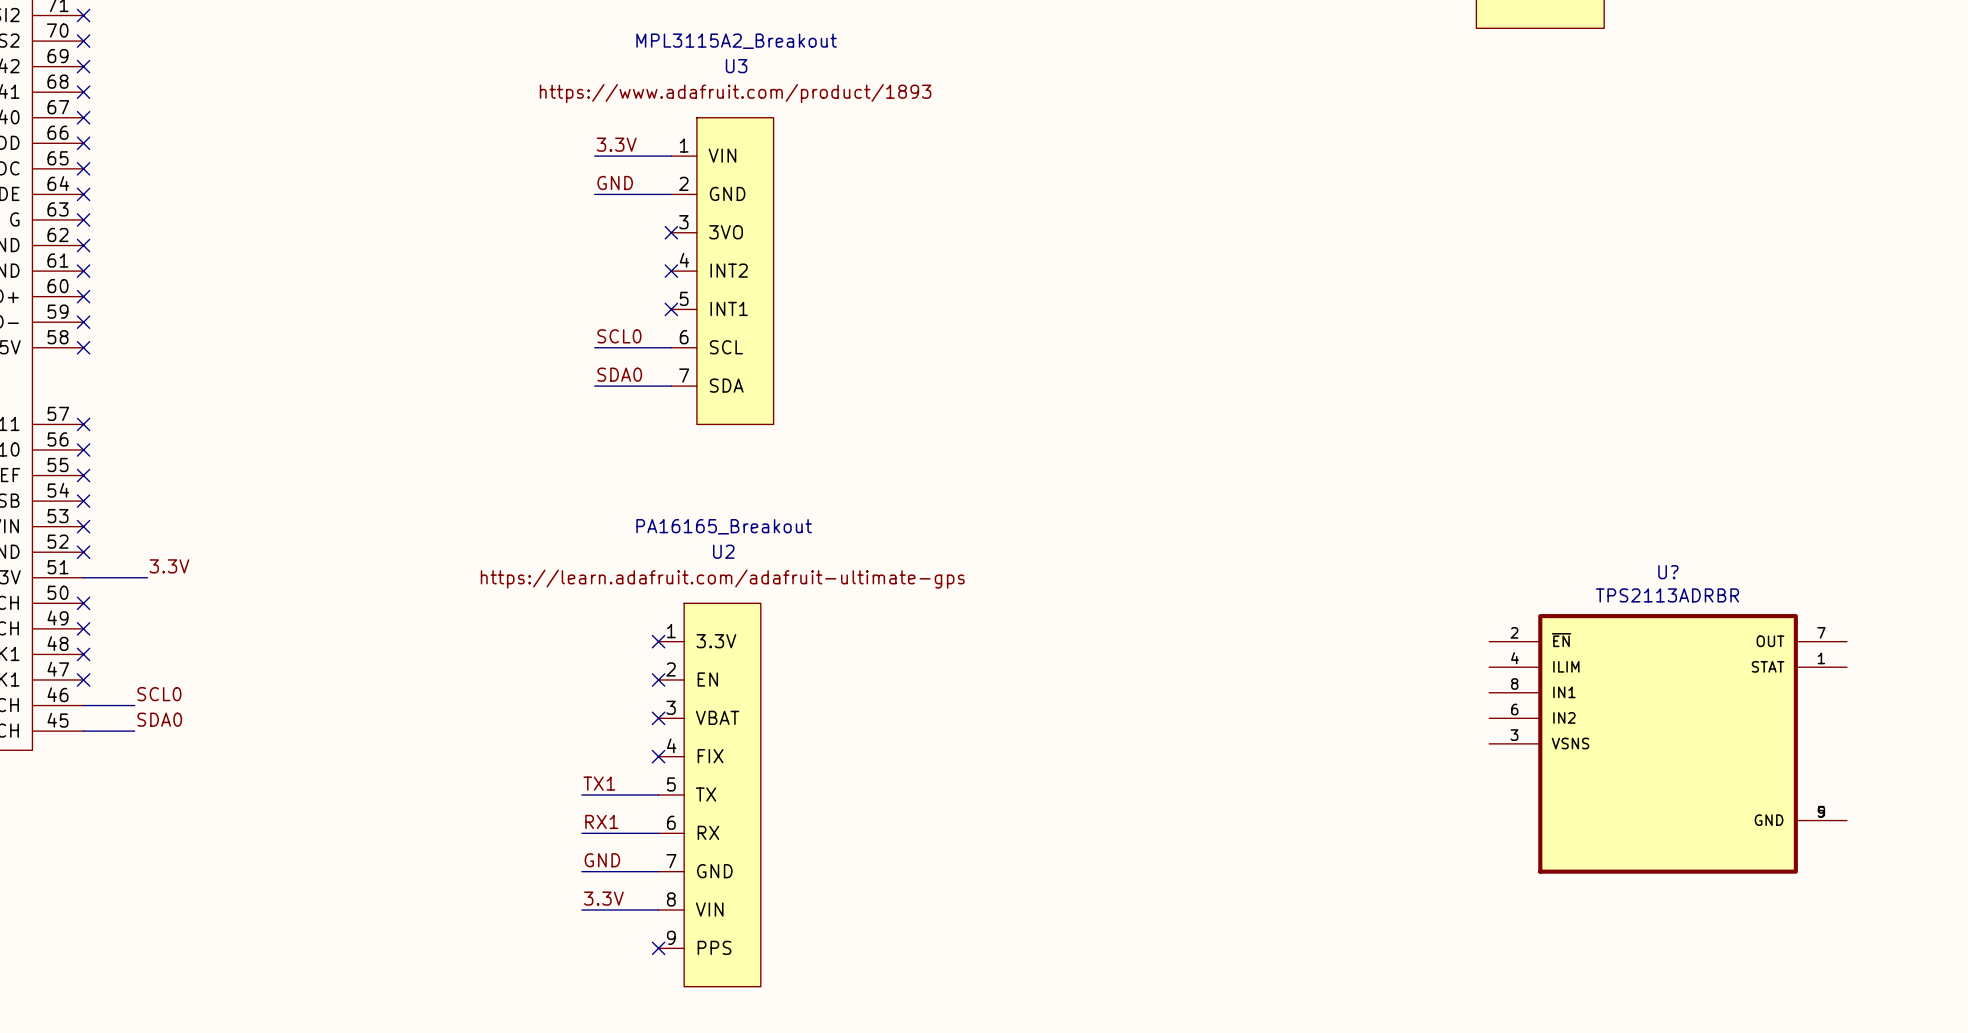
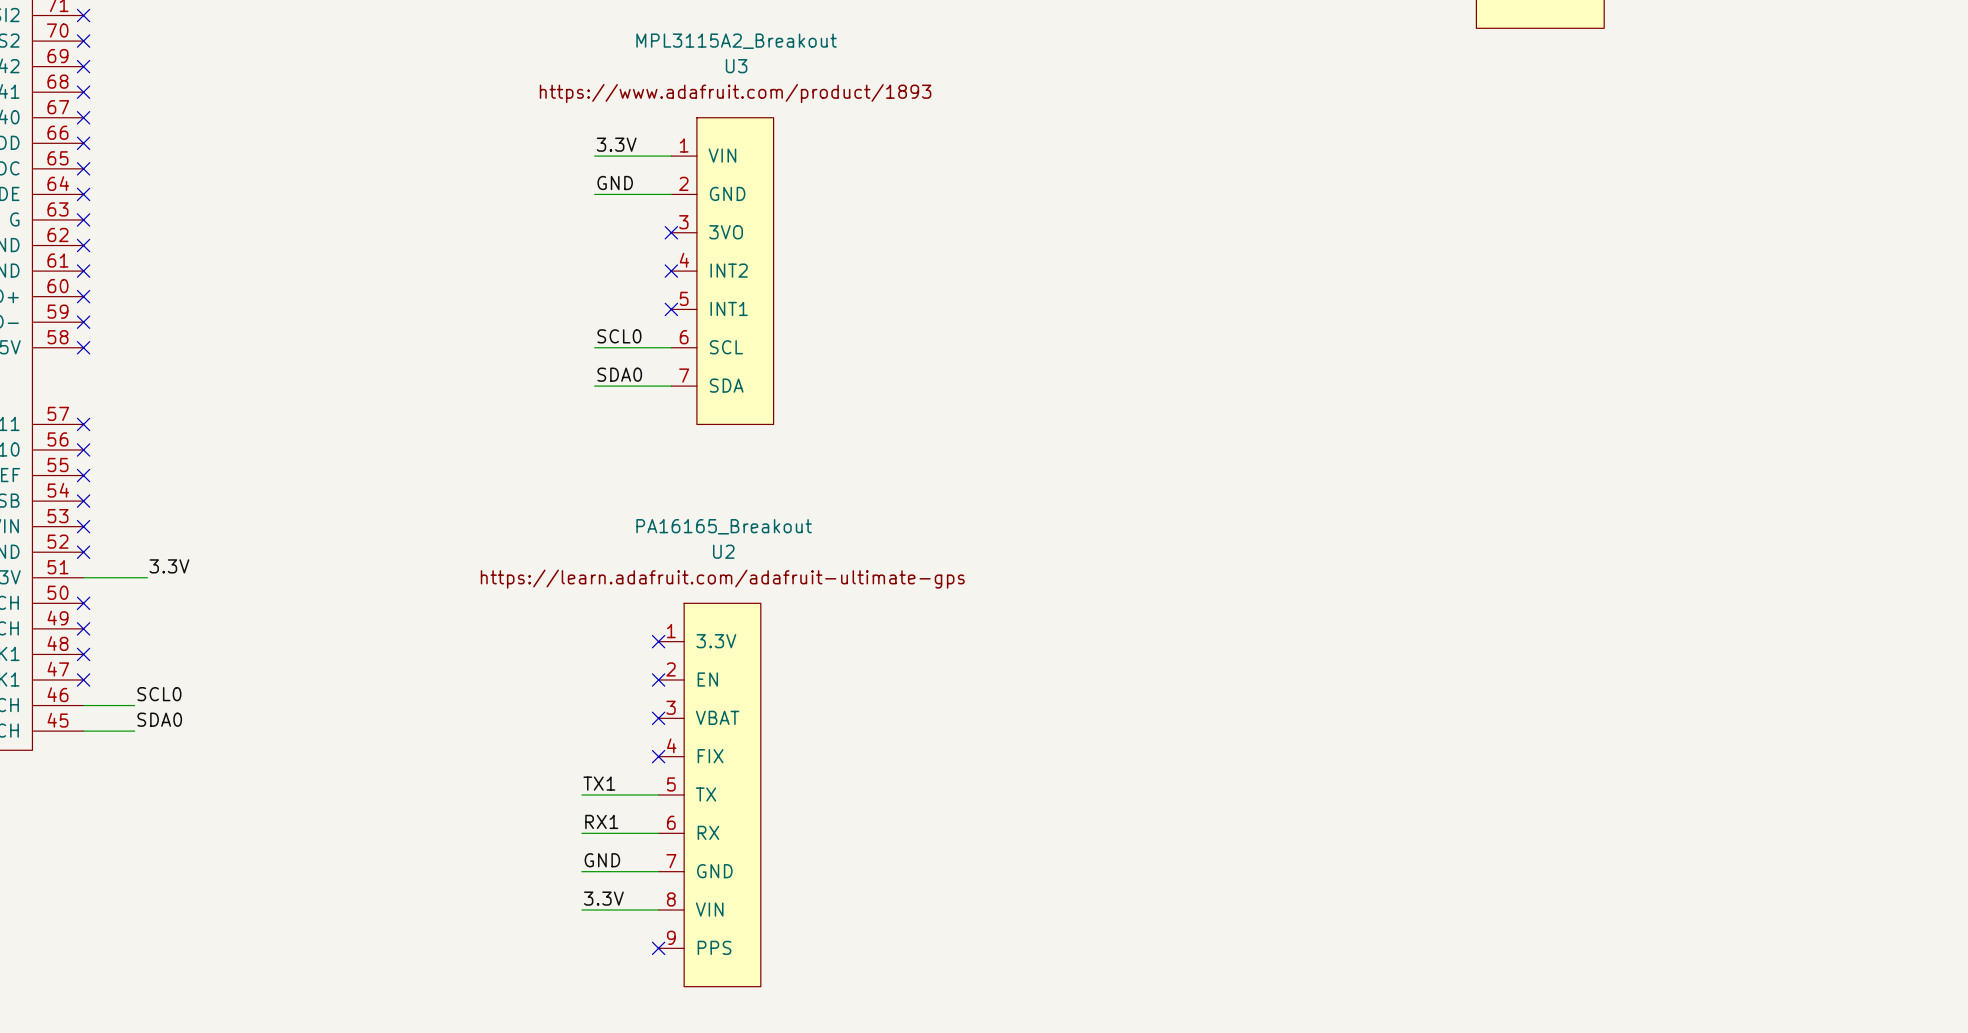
U?: TPS2113ADRBR (1668, 743) -> none

